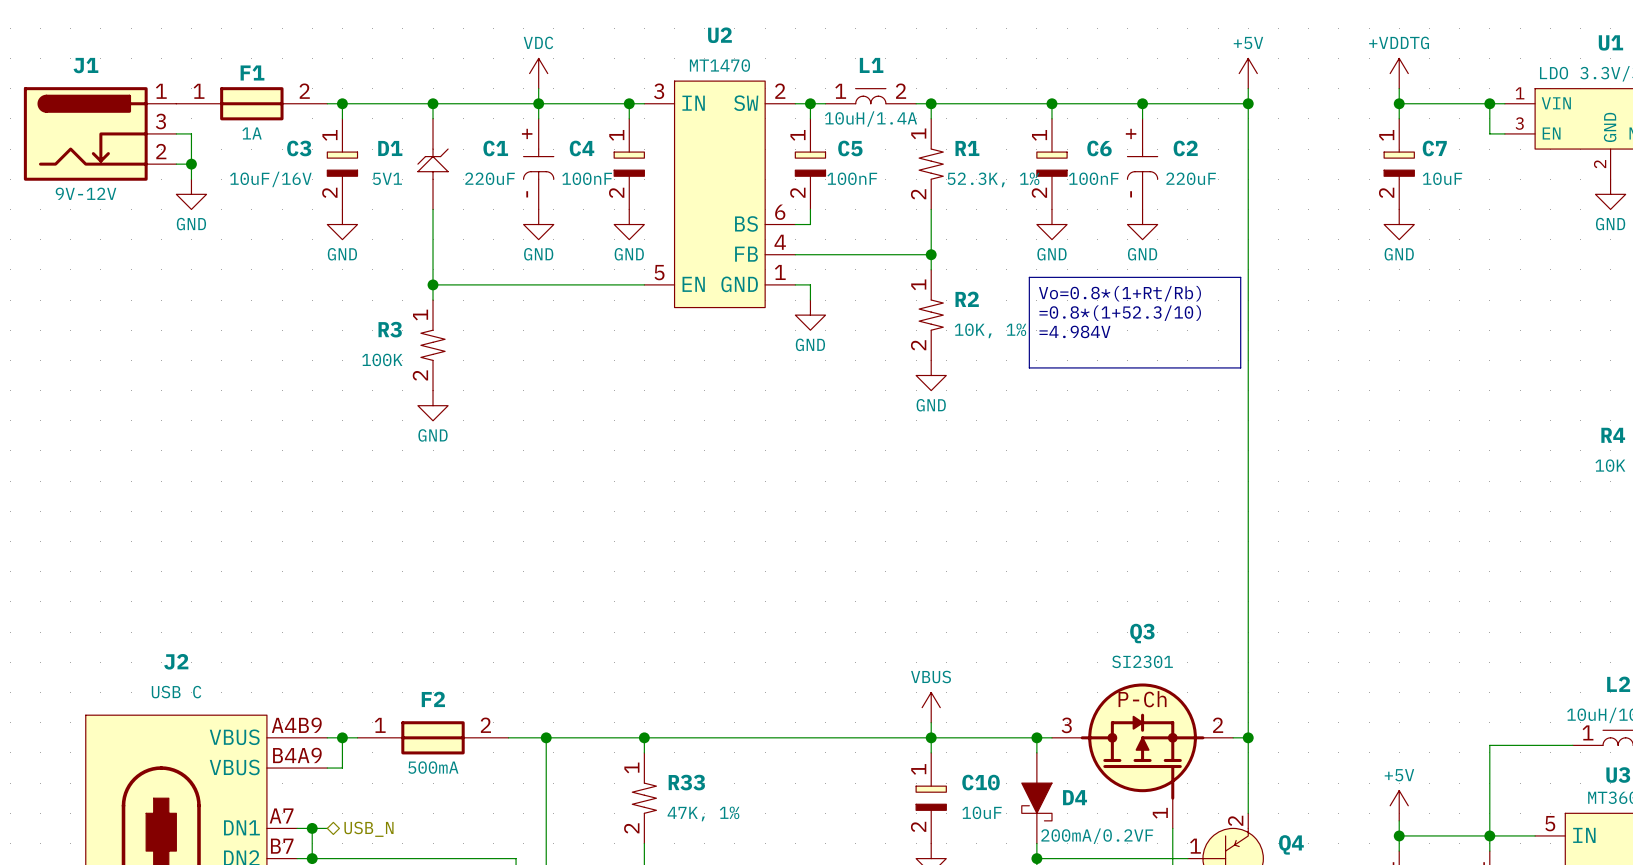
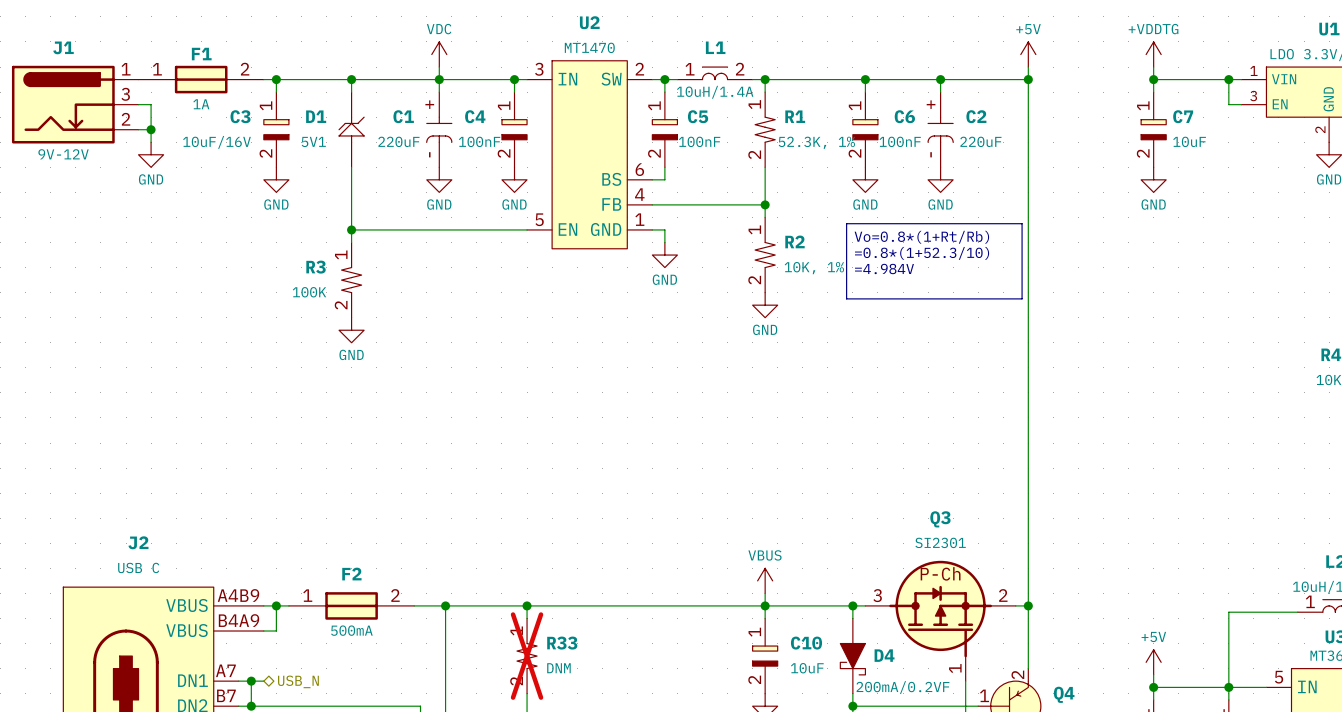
R33 do-not-place cross: none -> (527, 656)
R33 value: 47K, 1% (703, 813) -> DNM (558, 668)

